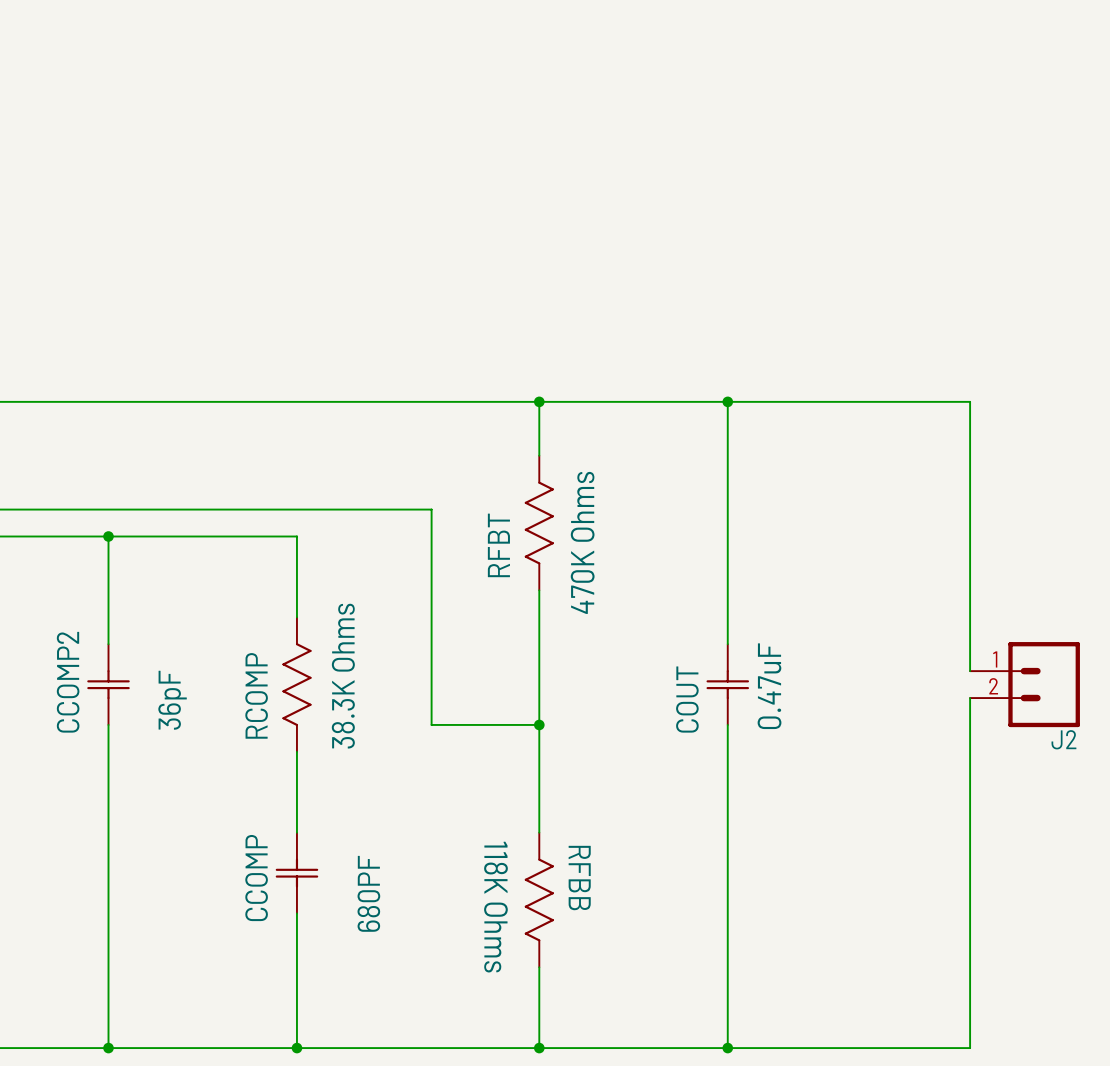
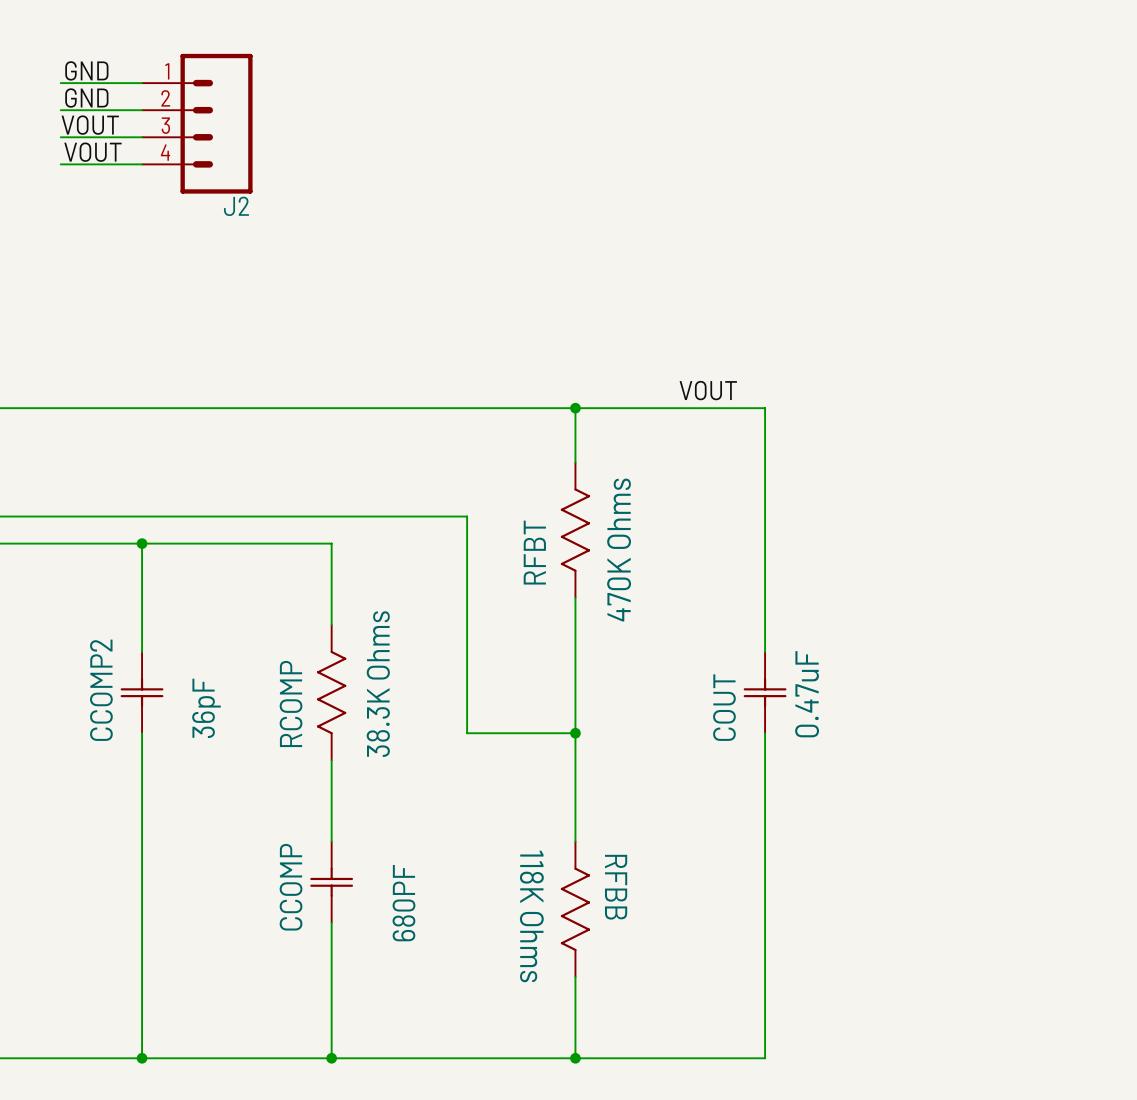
label: none -> GND (86, 70)
wire: none -> (60, 83) (142, 83)
label: none -> GND (86, 98)
wire: none -> (60, 110) (142, 110)
label: none -> VOUT (90, 125)
wire: none -> (60, 137) (142, 137)
label: none -> VOUT (92, 152)
wire: none -> (60, 164) (142, 164)
label: none -> VOUT (708, 390)
wire: (727, 401) (970, 401) (970, 671) -> none
junction: (727, 401) -> none
J2 symbol: [970, 642, 1080, 728] -> [142, 53, 253, 194]
wire: (970, 698) (970, 1048) (727, 1048) -> none
J2 name position: J2 (1063, 739) -> J2 (236, 206)
junction: (727, 1048) -> none

